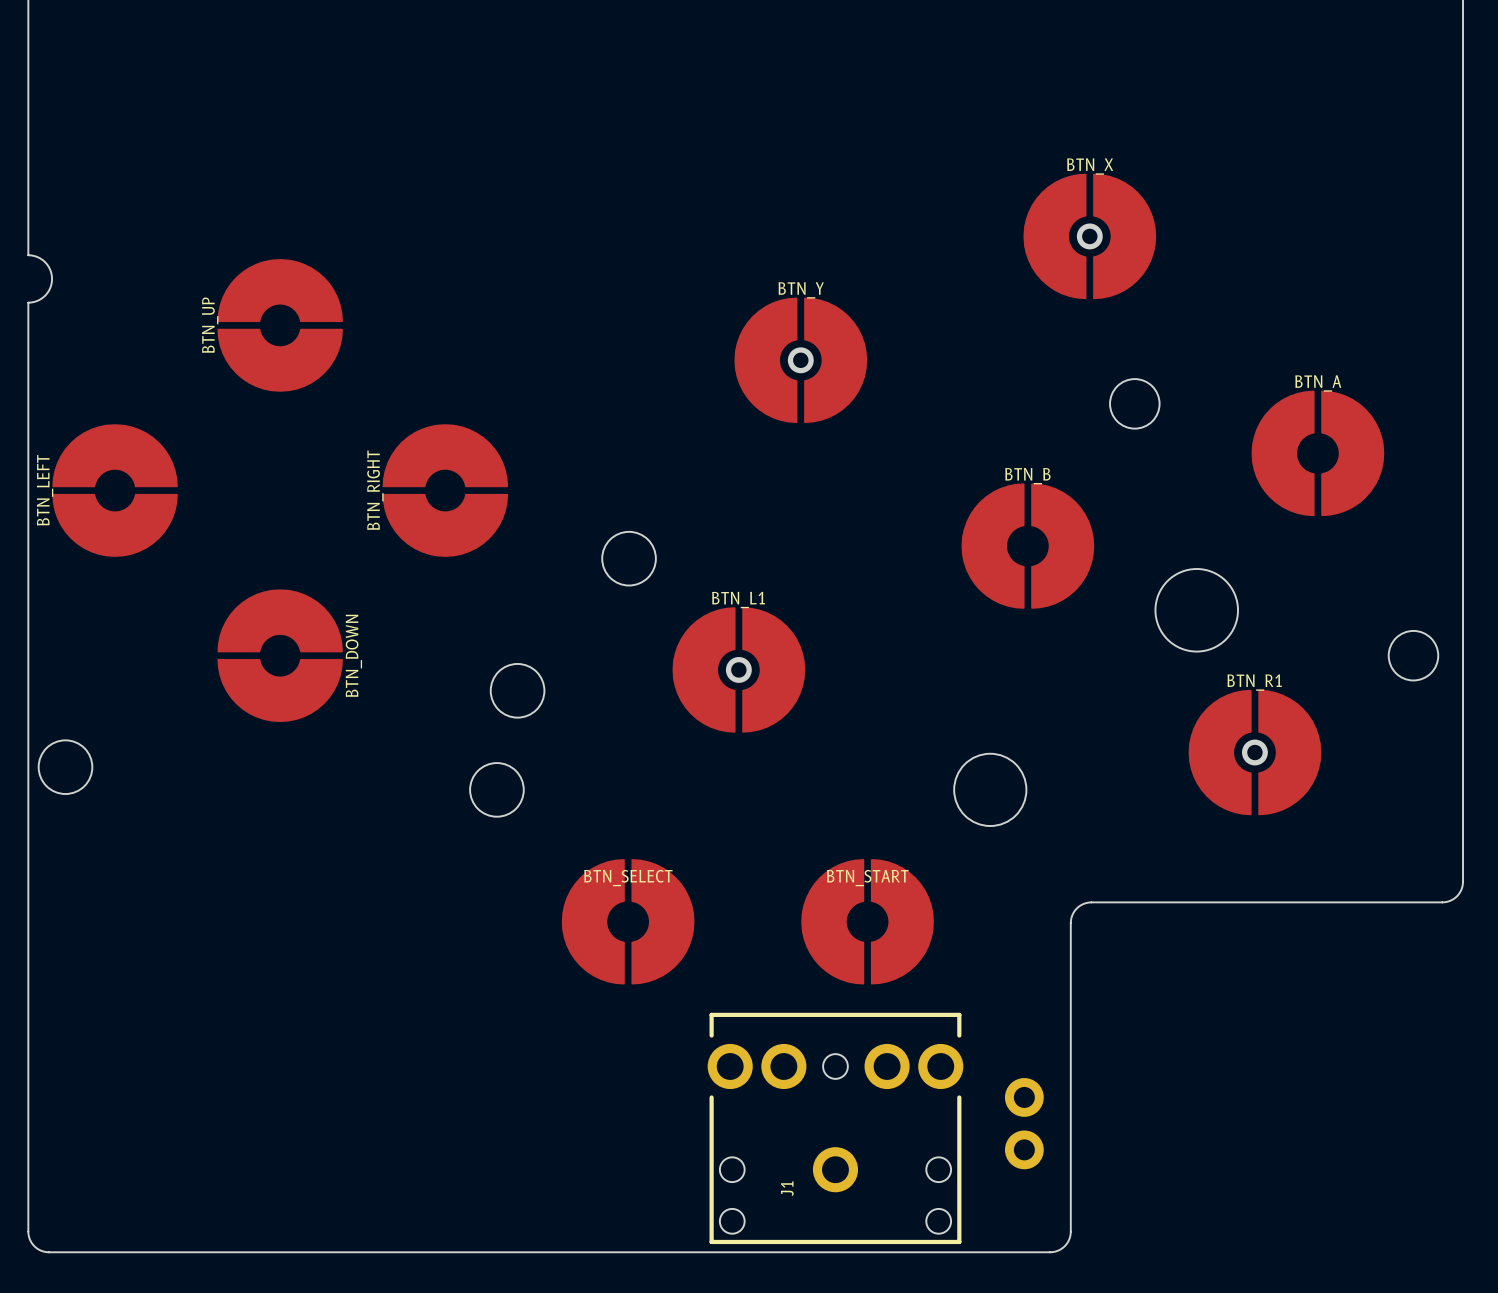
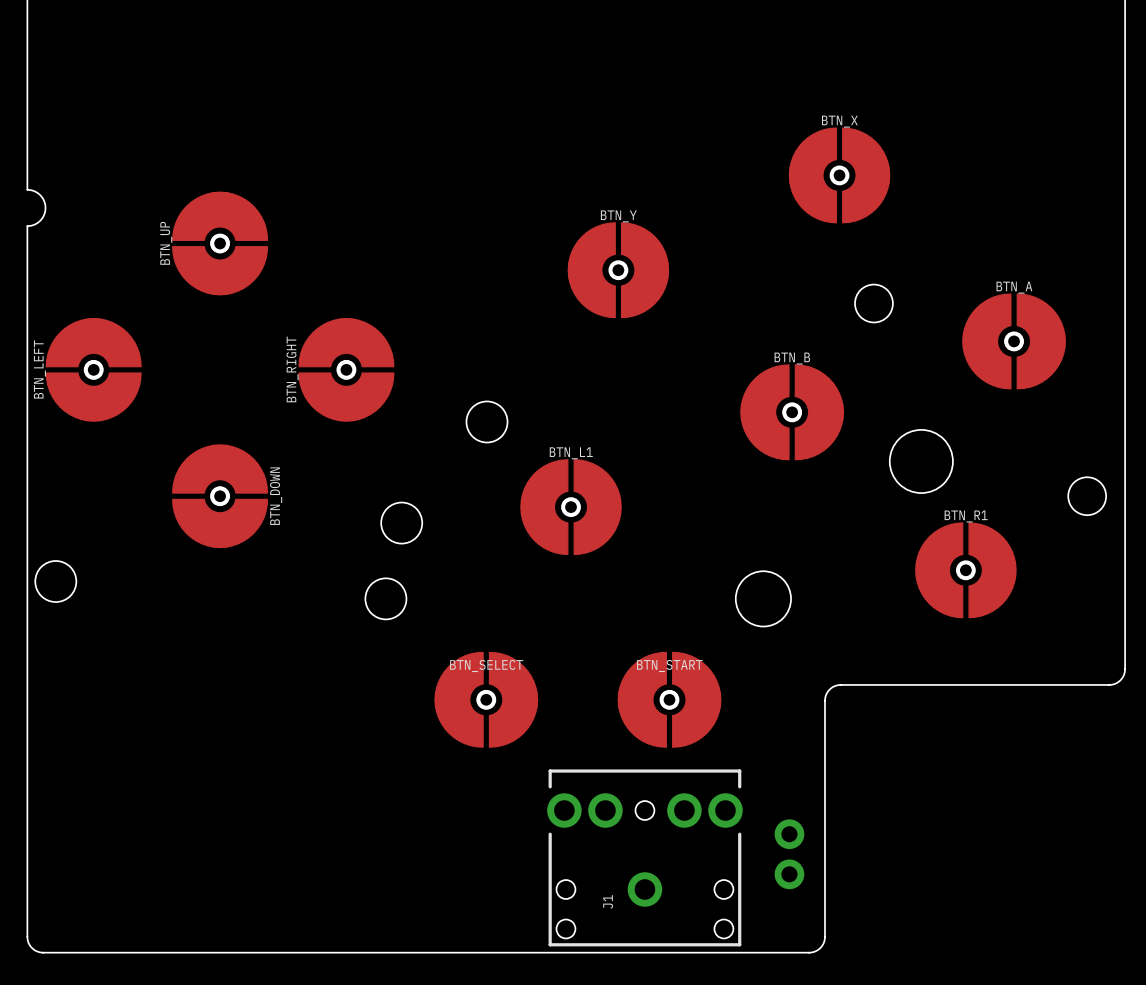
BTN_UP footprint: [217, 259, 343, 392] -> [172, 191, 269, 296]
BTN_A footprint: [1251, 390, 1385, 517] -> [962, 293, 1066, 390]
BTN_LEFT footprint: [52, 424, 178, 557] -> [45, 317, 142, 422]
BTN_RIGHT footprint: [382, 424, 509, 557] -> [298, 317, 395, 422]
BTN_B footprint: [961, 483, 1095, 609] -> [740, 364, 845, 461]
BTN_DOWN footprint: [217, 589, 343, 723] -> [172, 444, 269, 549]
BTN_SELECT footprint: [561, 859, 695, 985] -> [434, 651, 539, 748]
BTN_START footprint: [801, 859, 934, 985] -> [617, 651, 722, 748]

